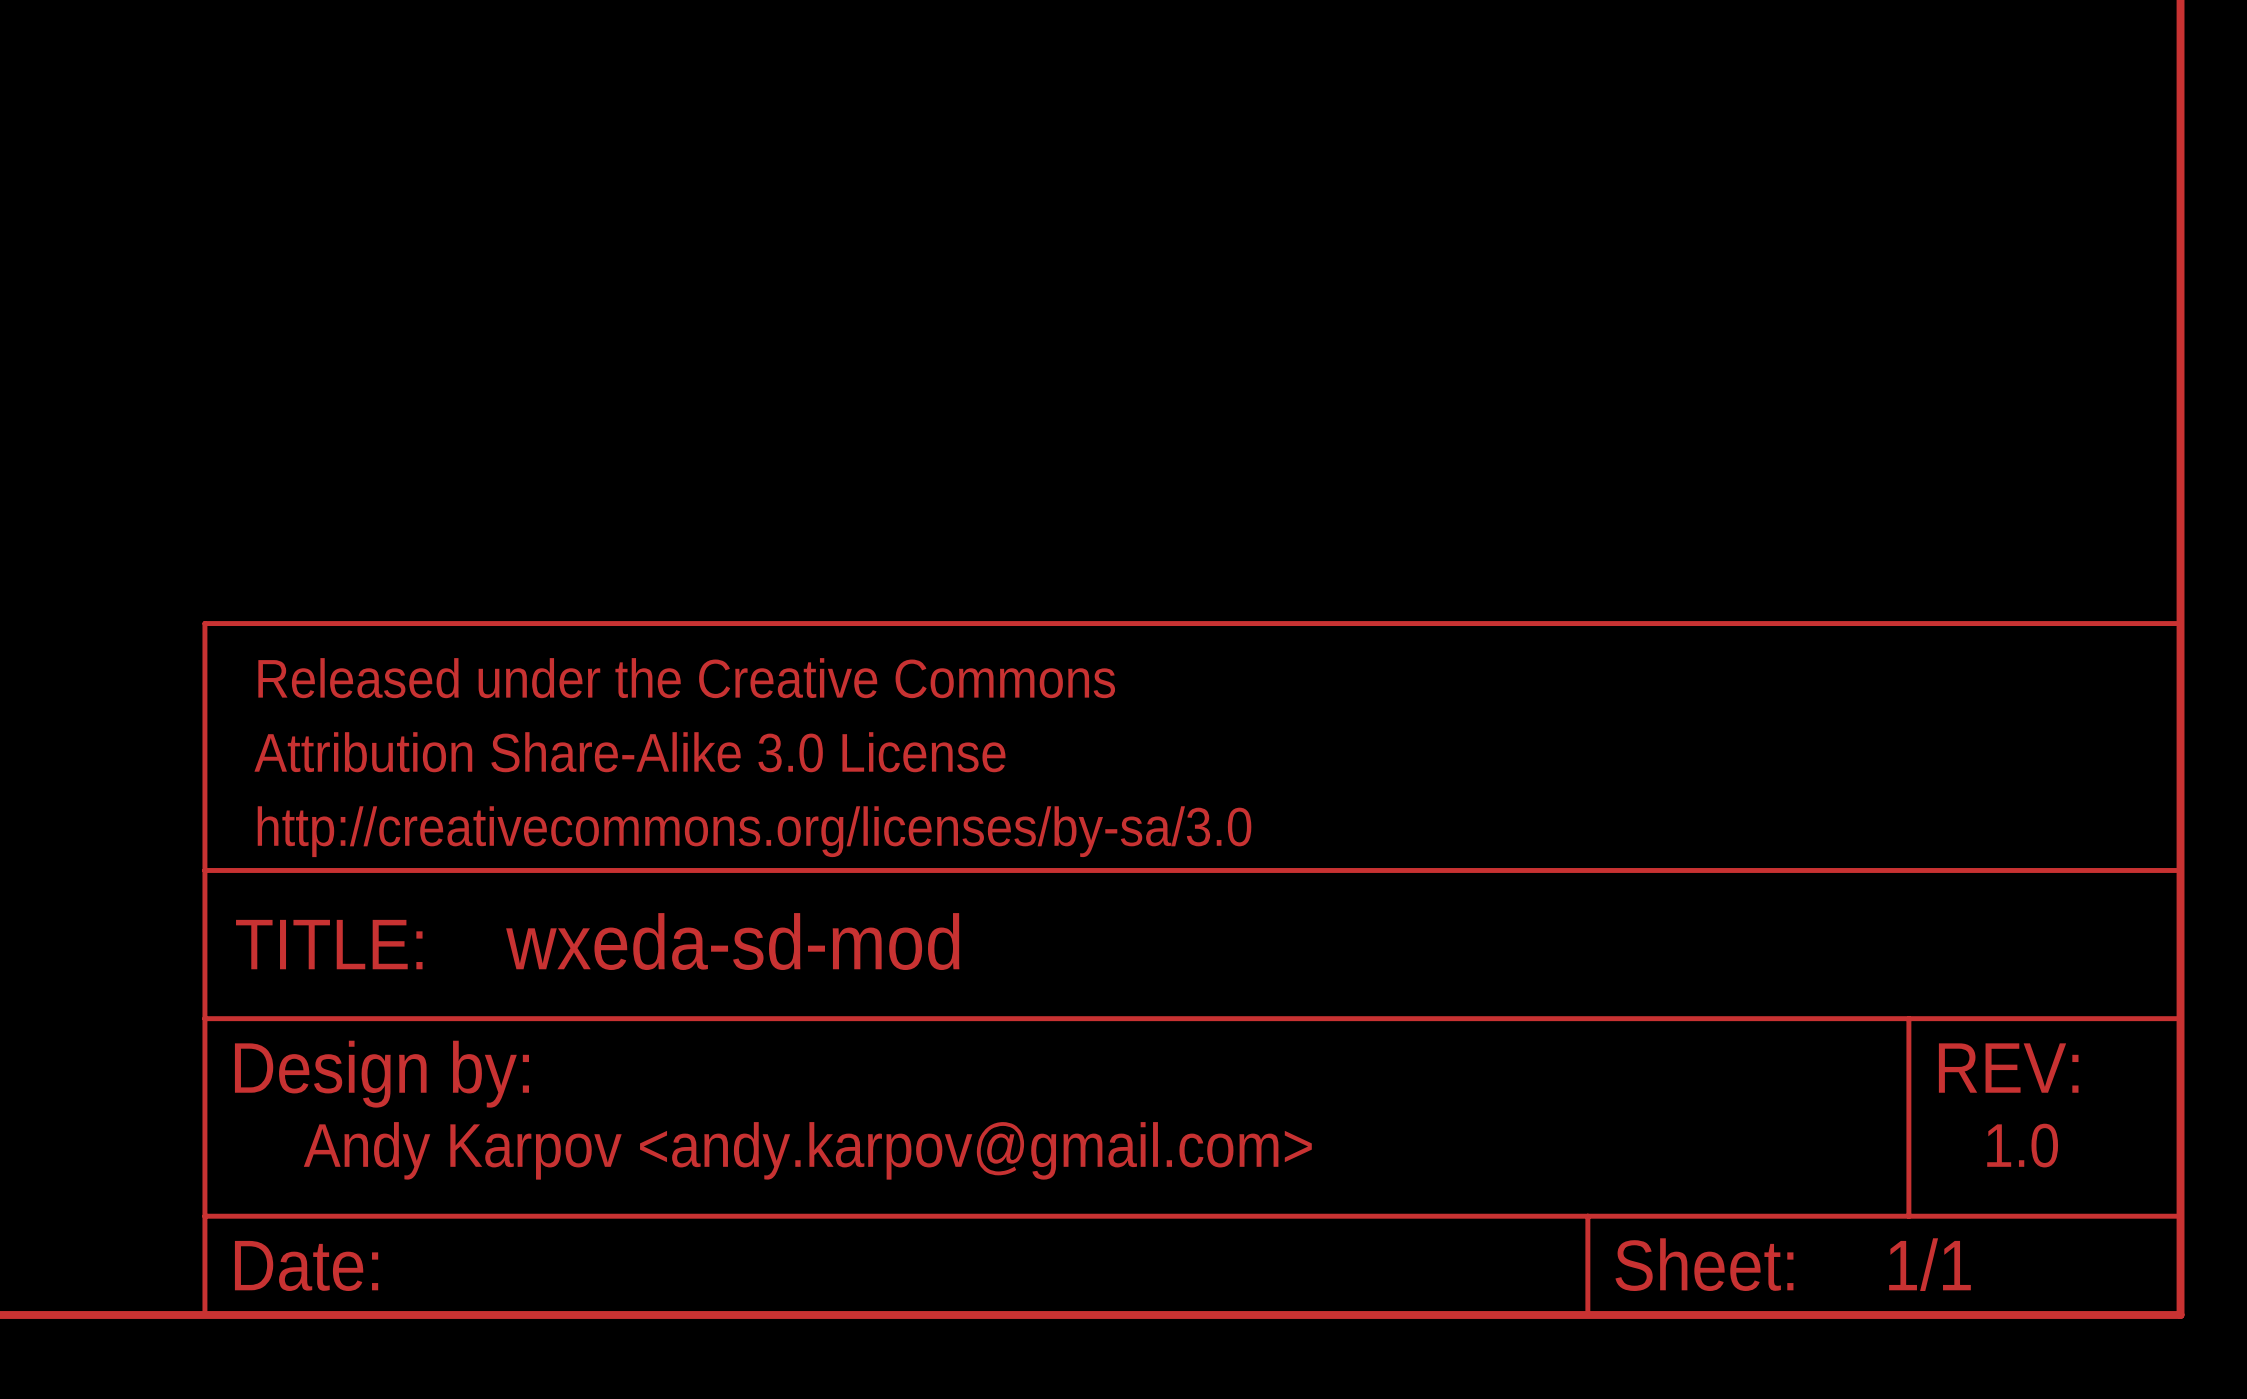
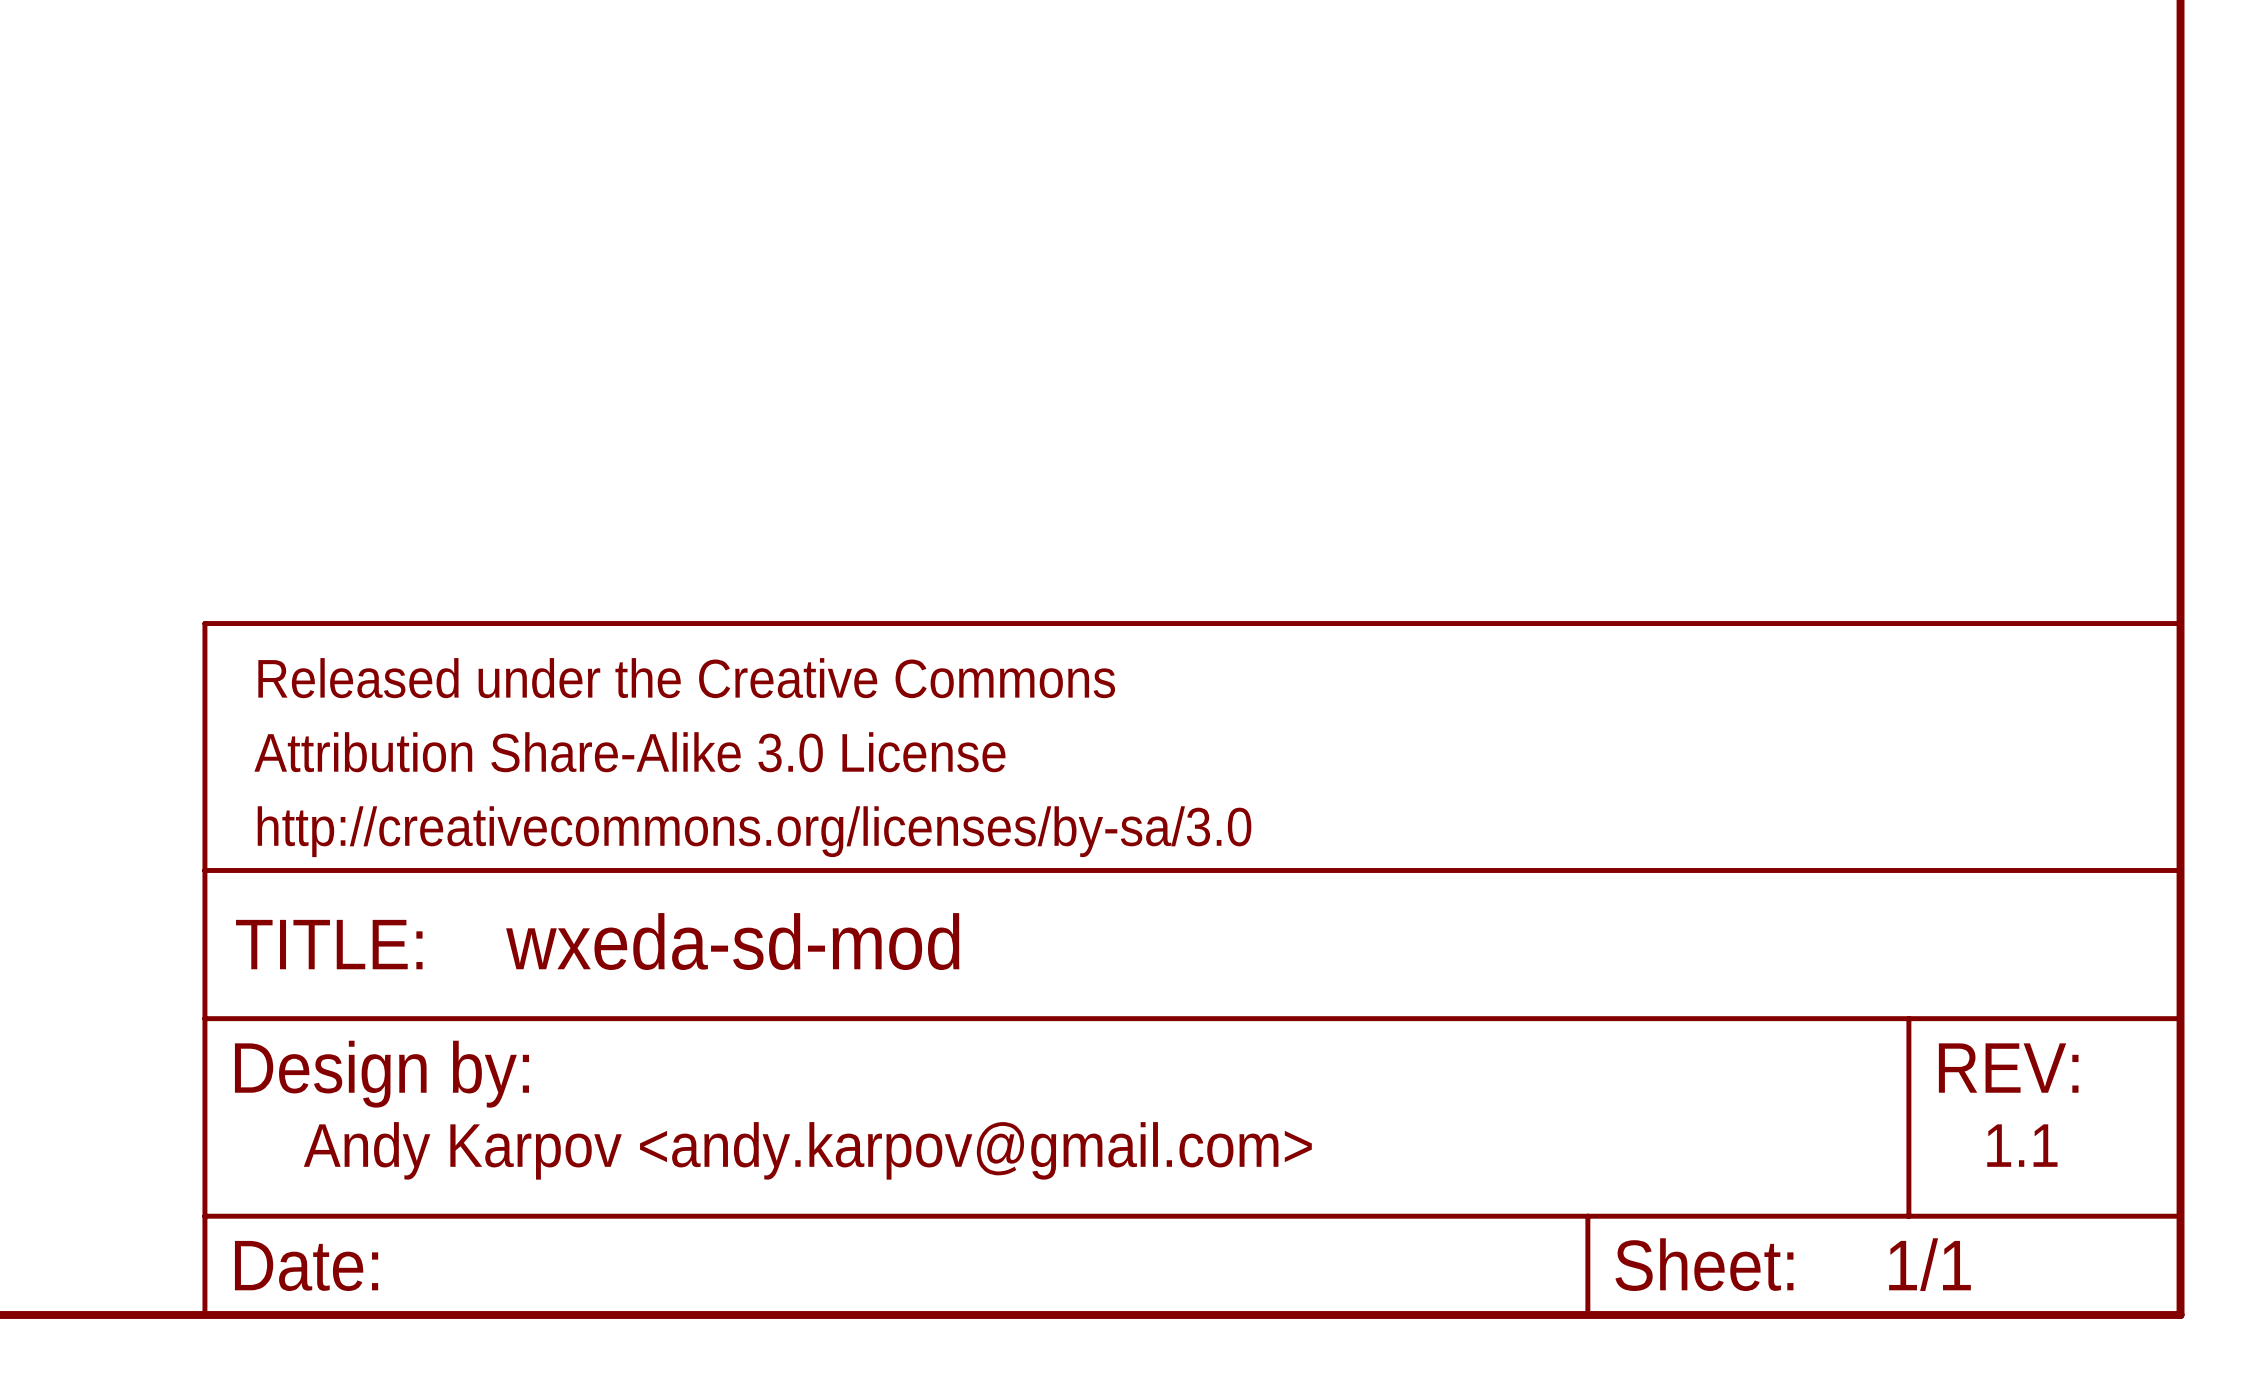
text: 1.0 (2022, 1145) -> 1.1 (2022, 1145)

